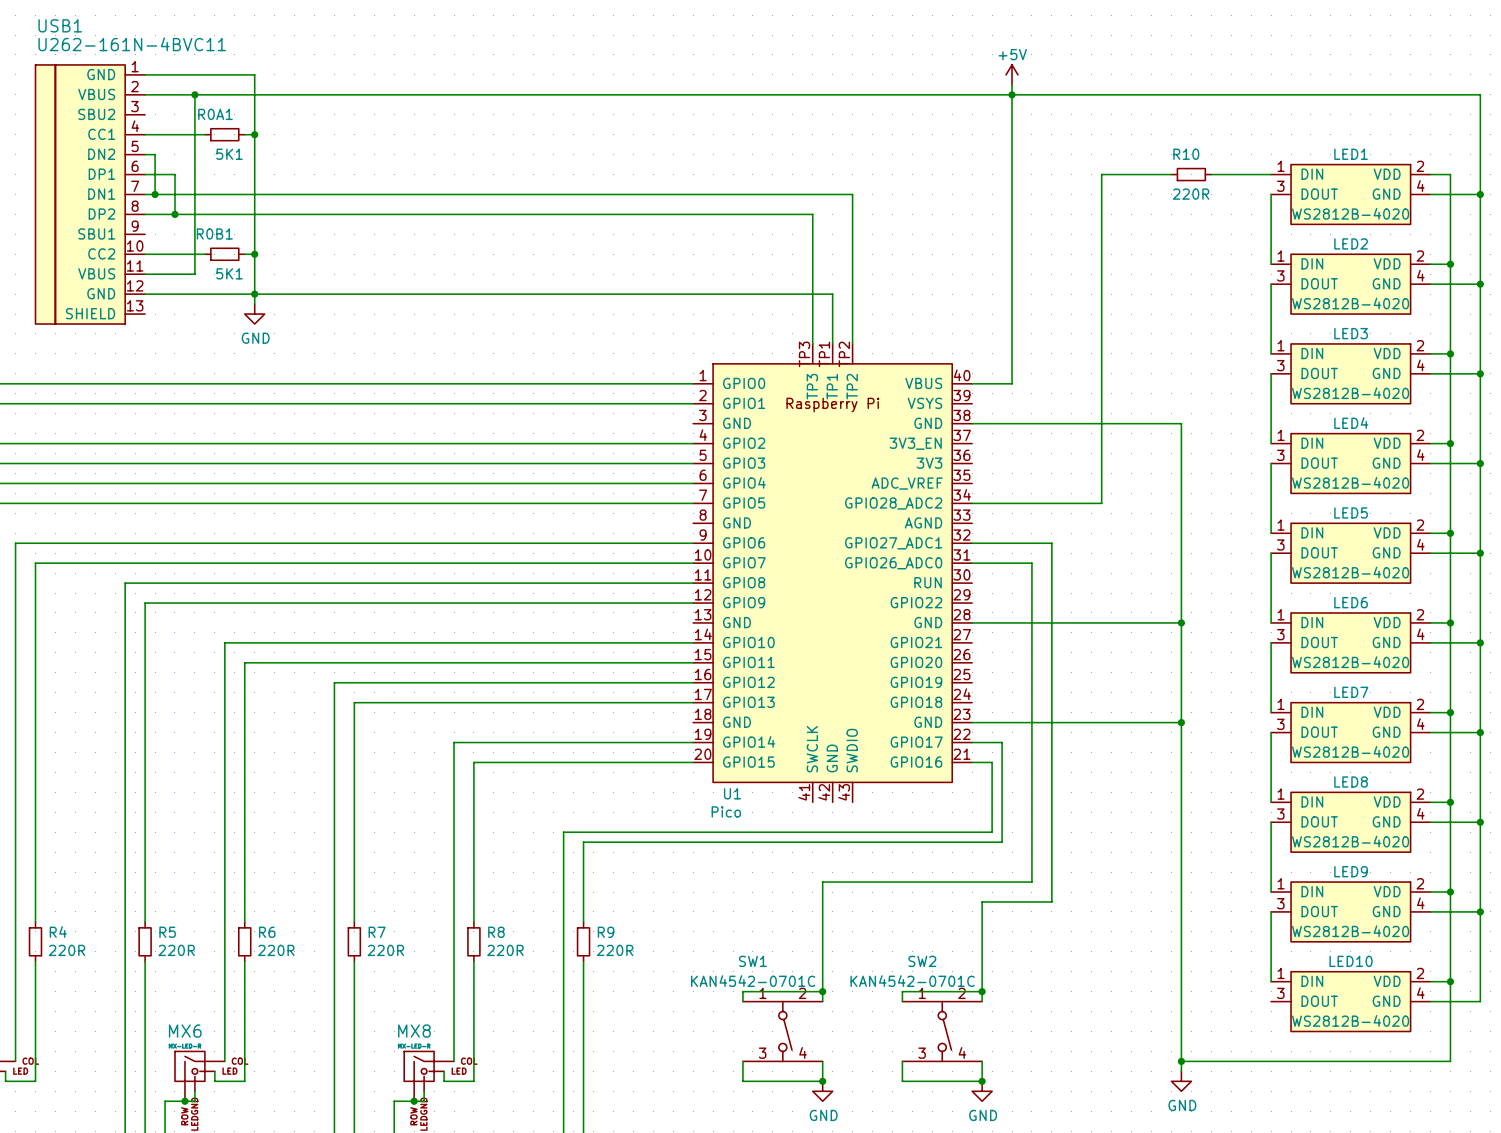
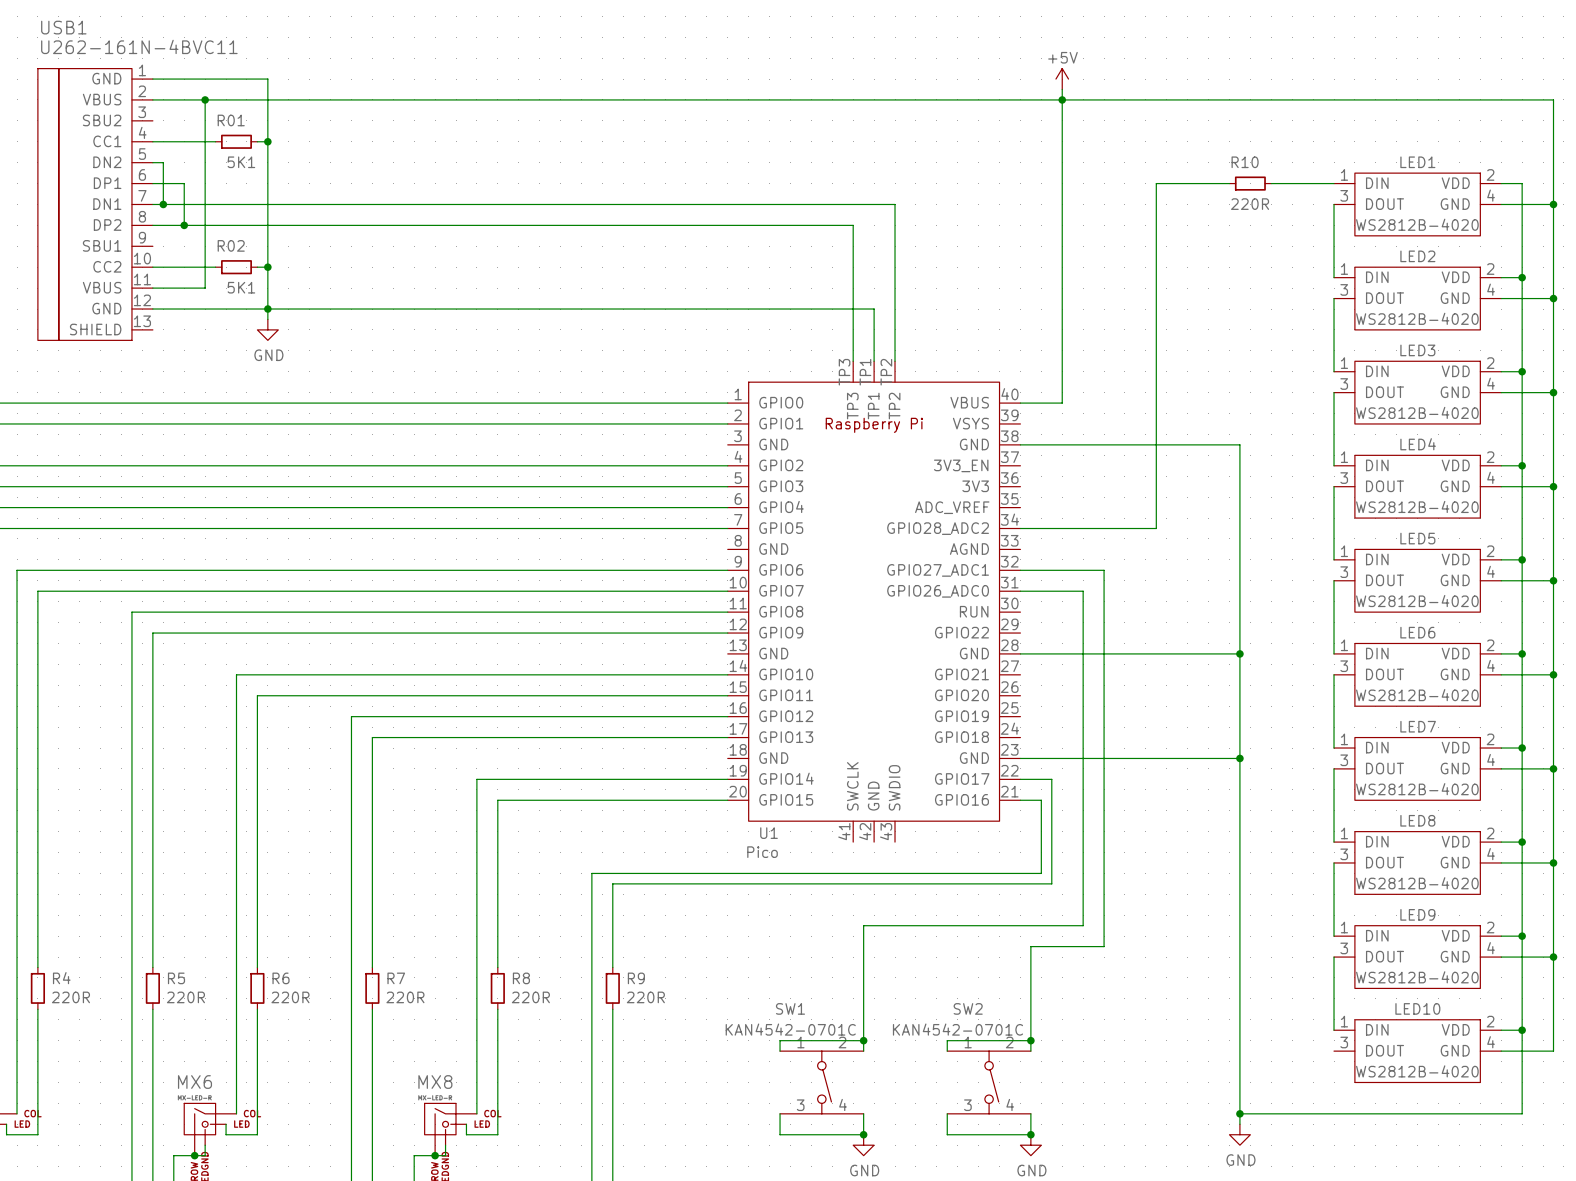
R0A1 name: R0A1 (215, 114) -> R01 (231, 120)
R0B1 name: R0B1 (214, 233) -> R02 (231, 245)

